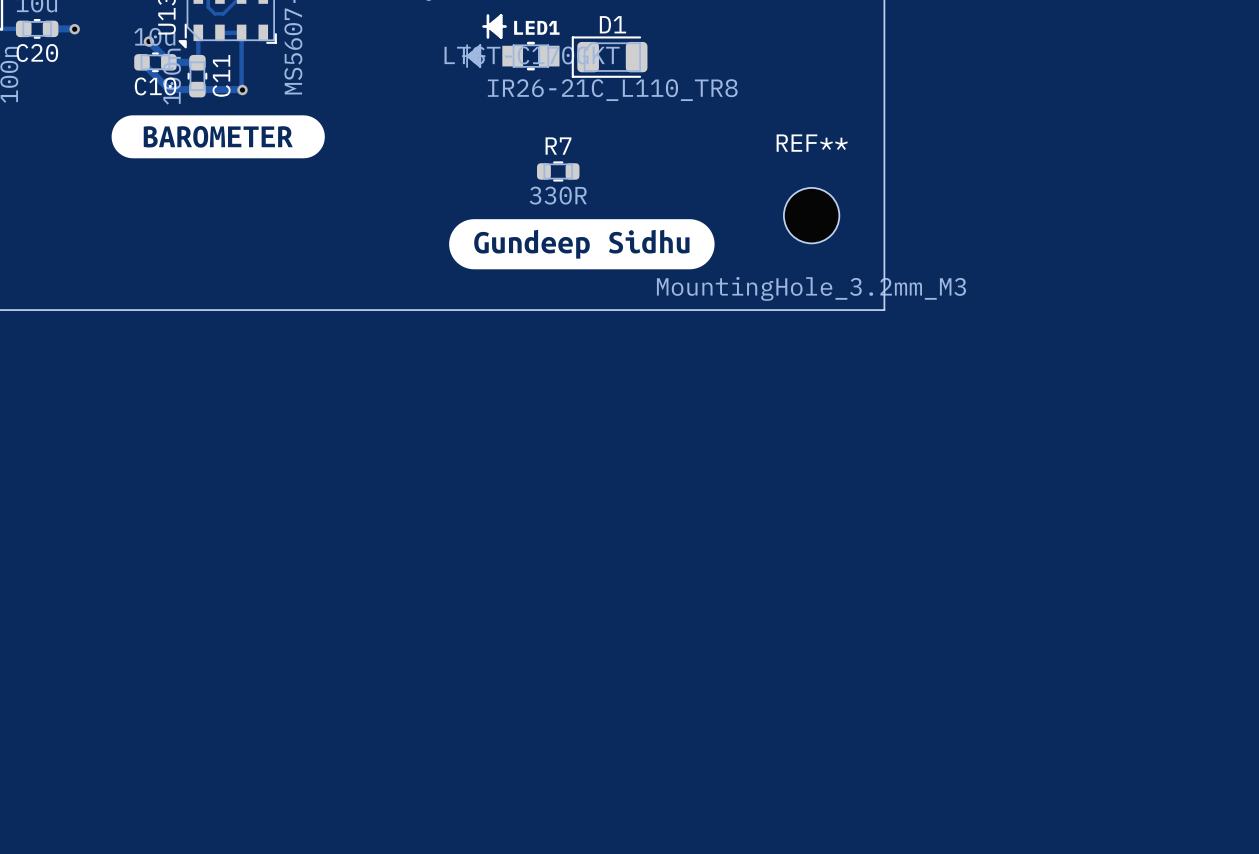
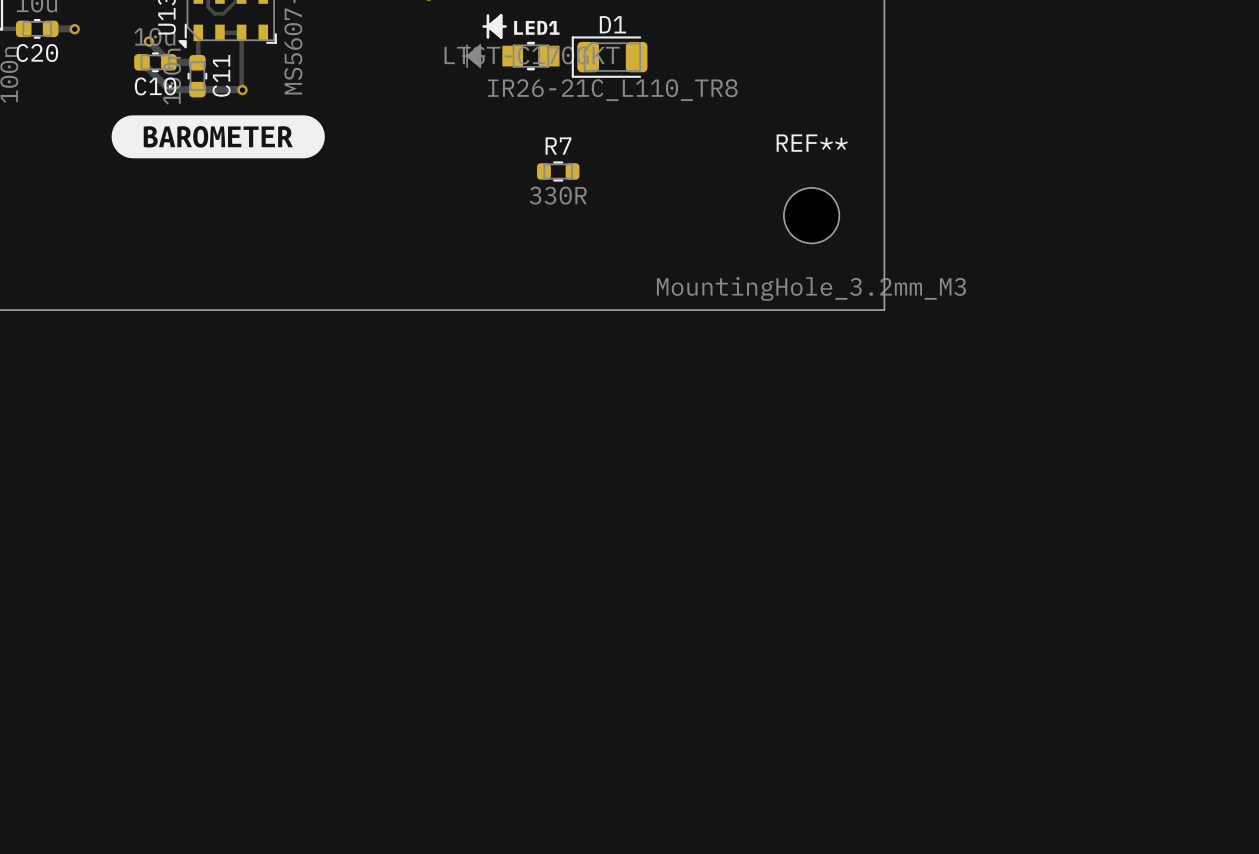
drawing: [449, 219, 715, 270] -> none

